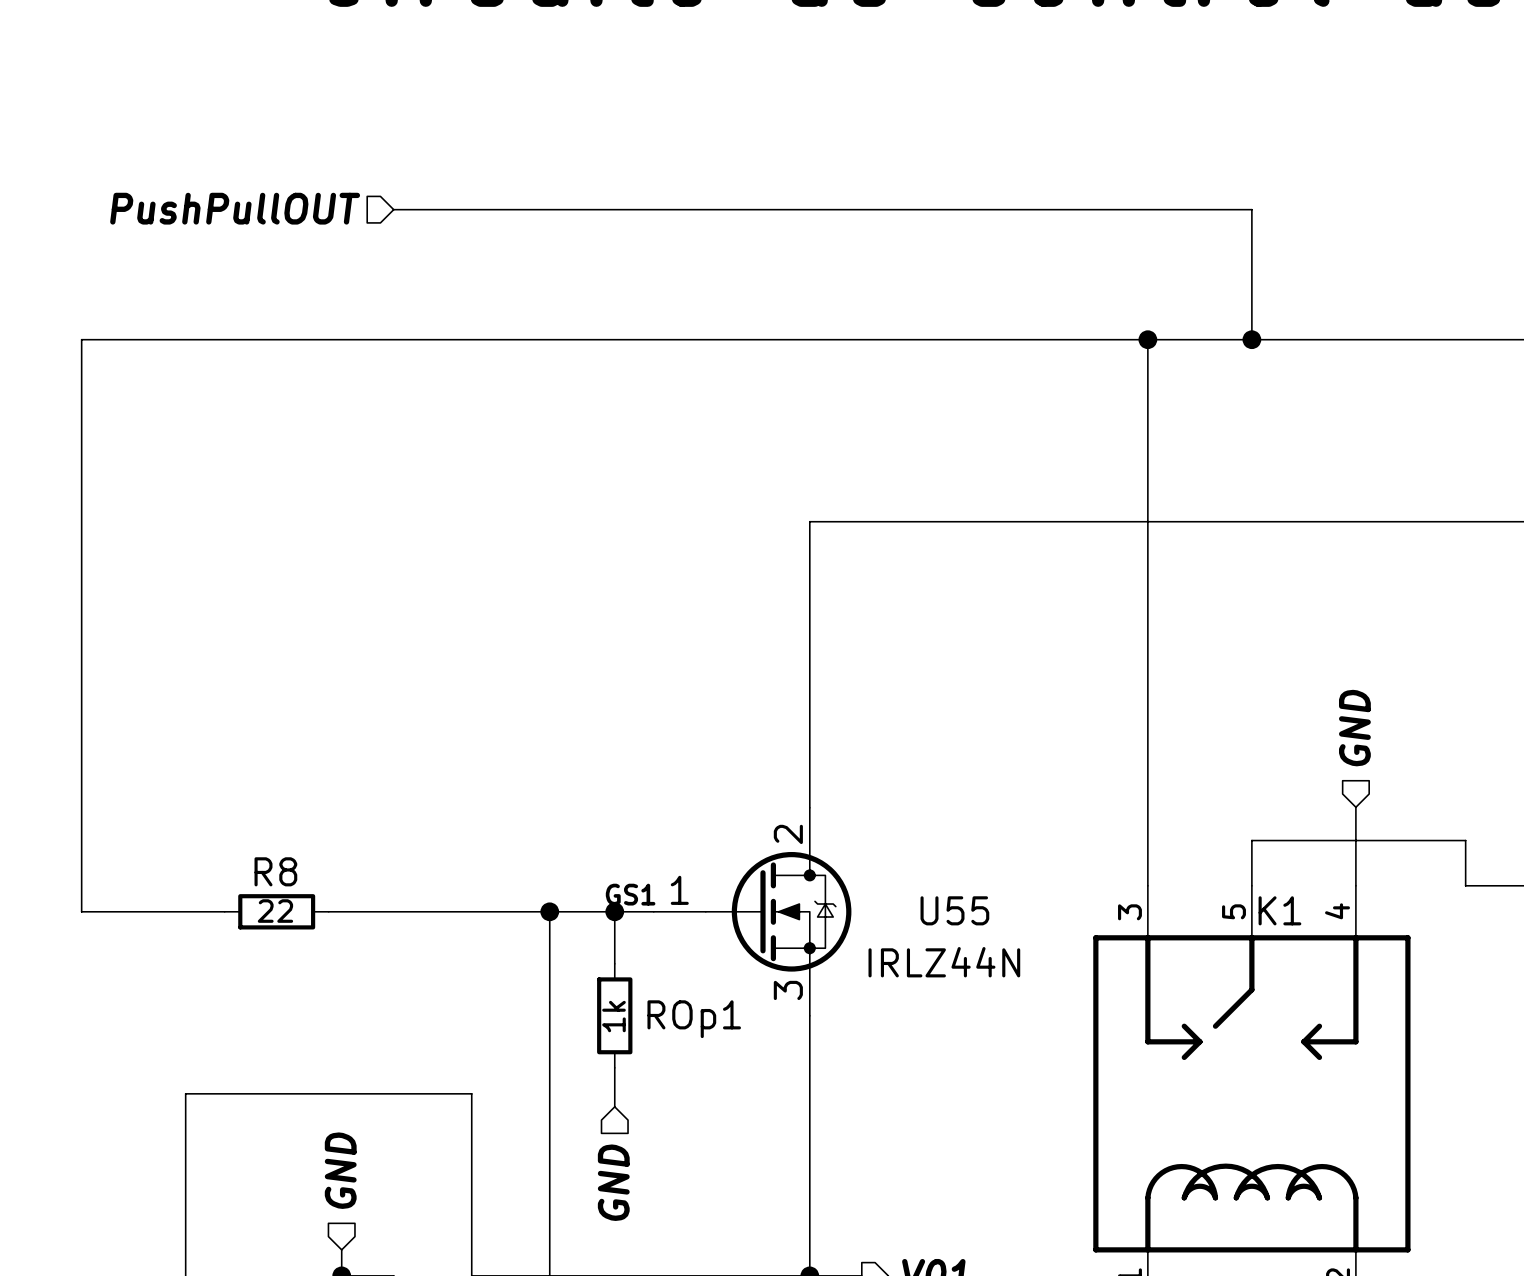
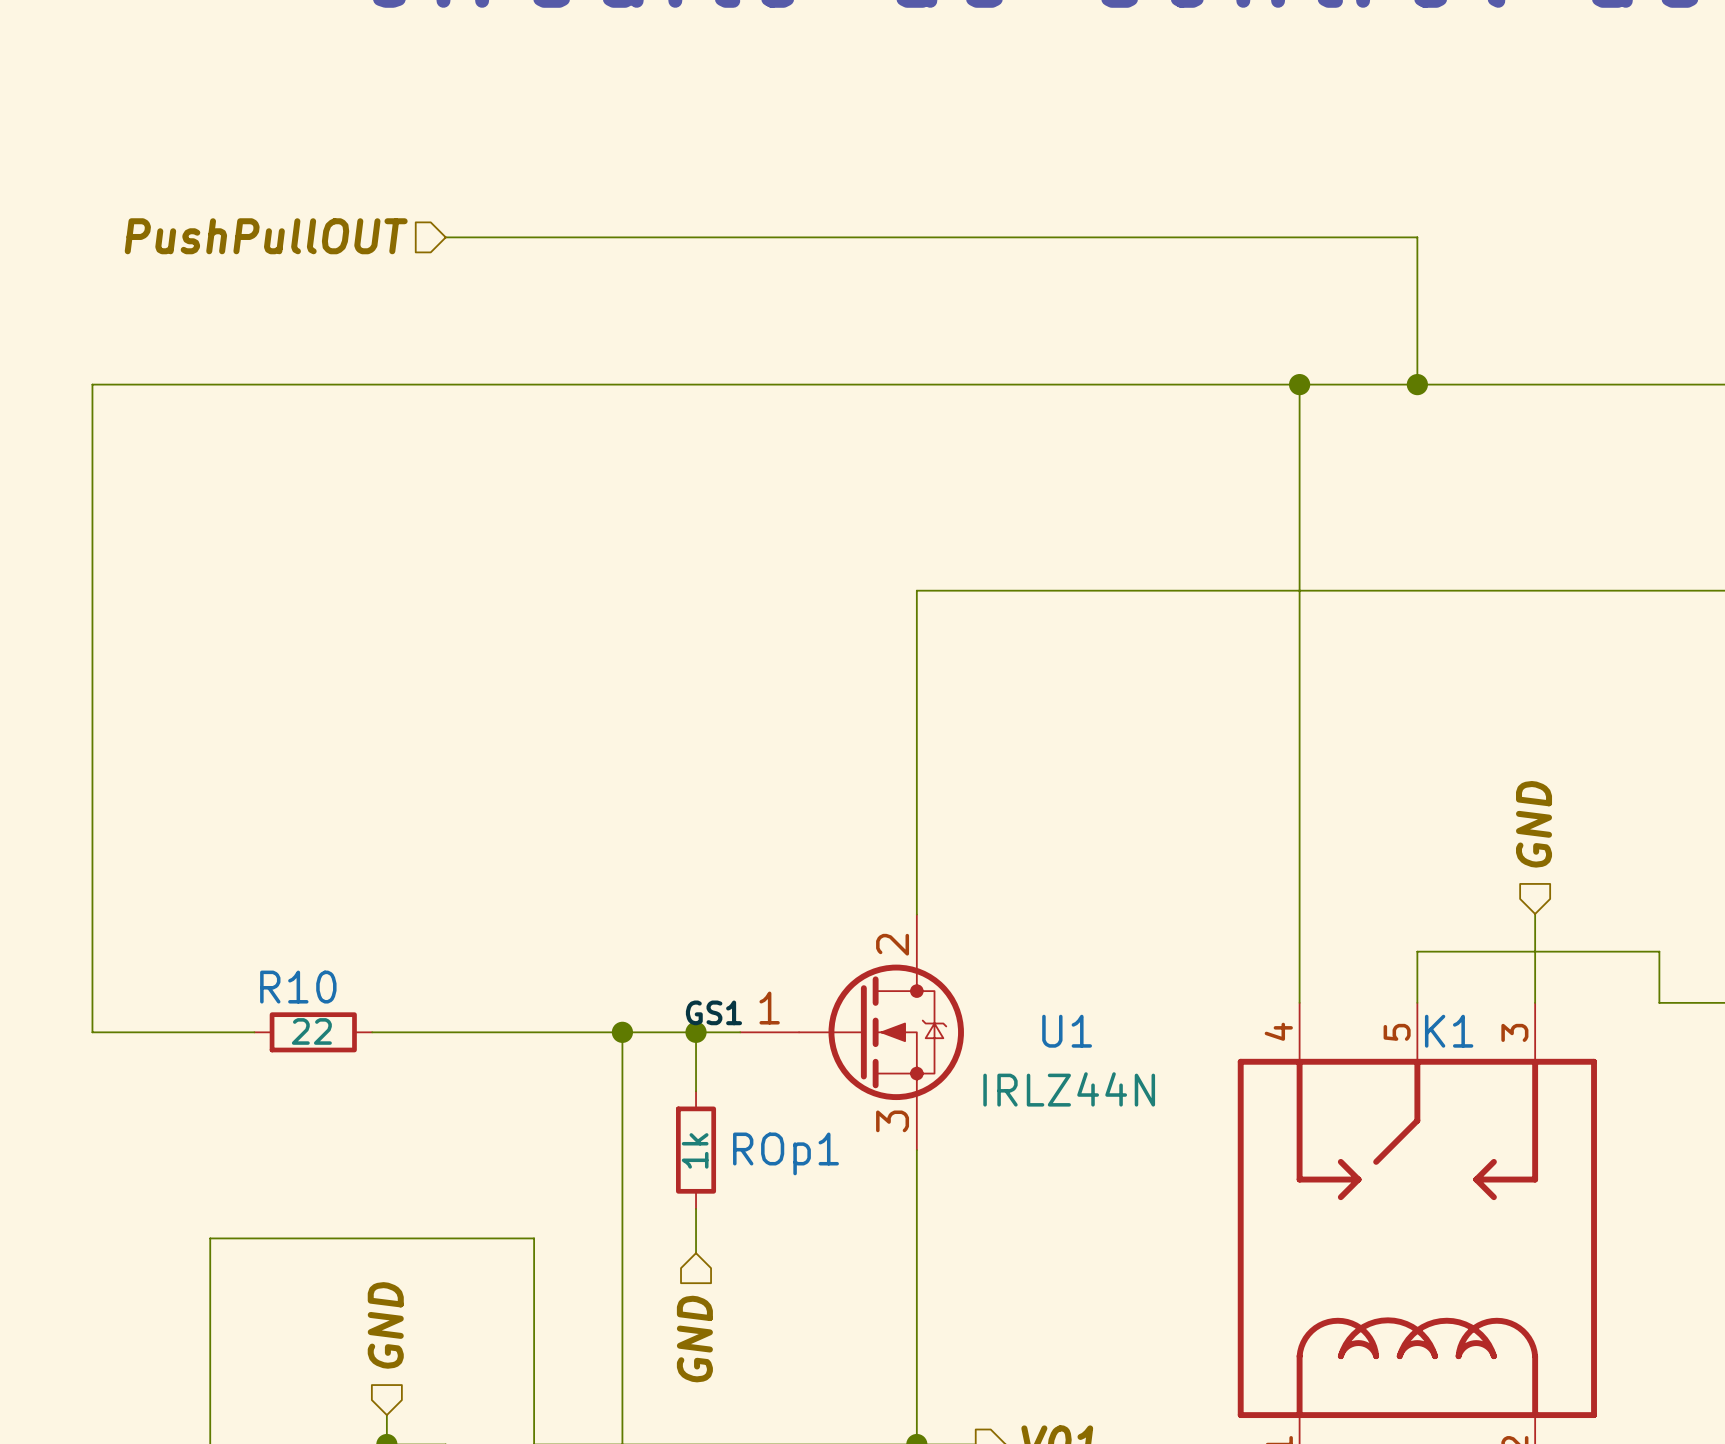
R8 name: R8 (275, 871) -> R10 (298, 987)
U55 name: U55 (954, 910) -> U1 (1067, 1031)
K1 pin number: 4 (1337, 911) -> 3 (1514, 1032)
K1 pin number: 3 (1129, 912) -> 4 (1278, 1031)

